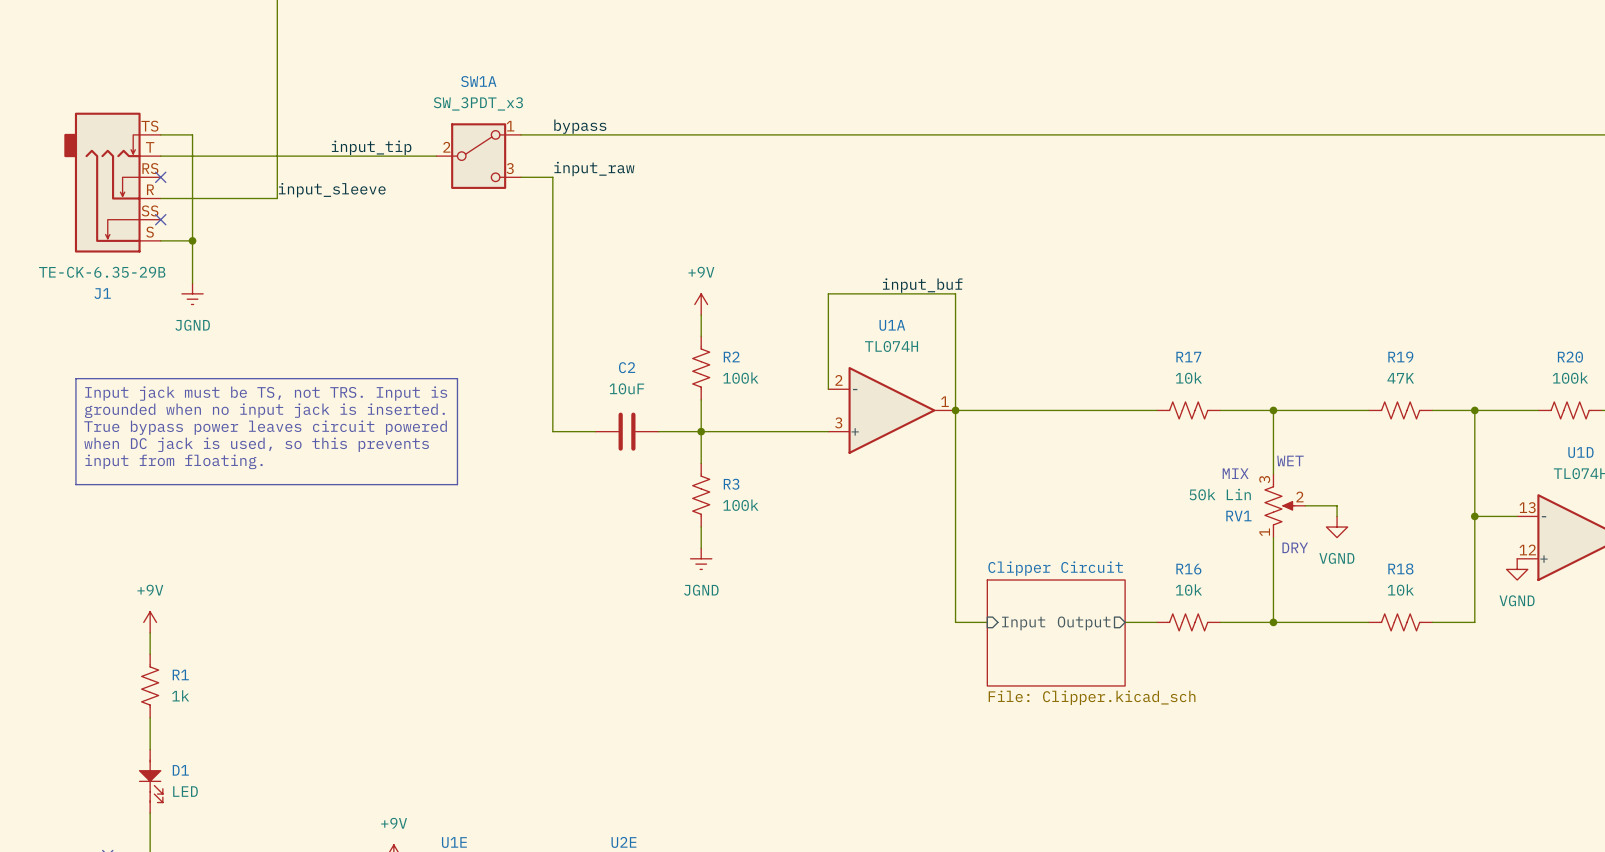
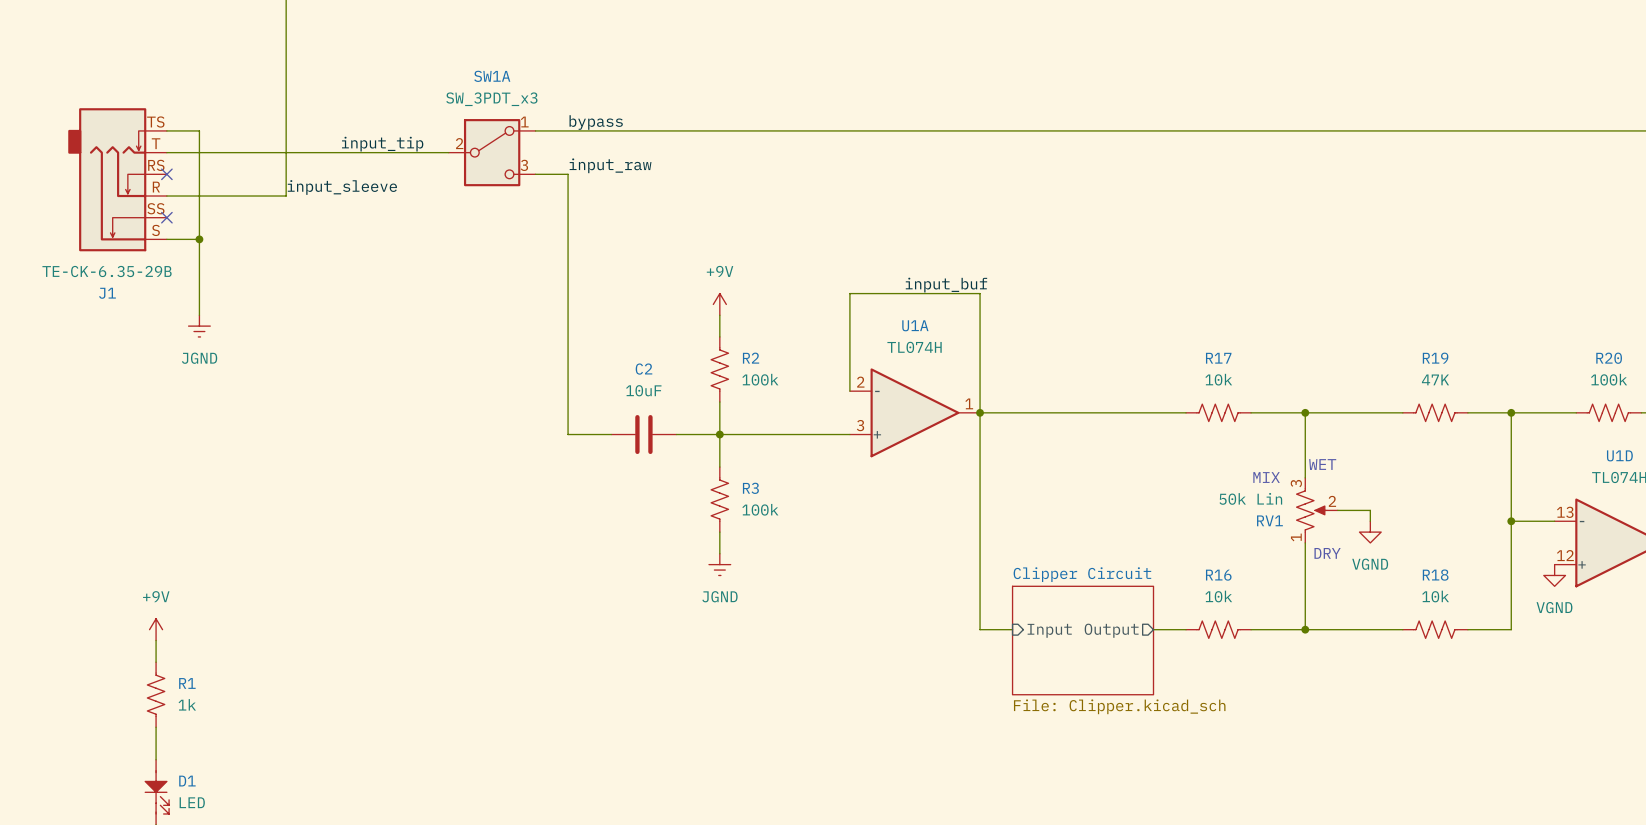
wire: none -> (199, 282) (199, 315)
power symbol position: JGND (192, 293) -> JGND (199, 326)
line: (75, 378) (457, 378) (457, 484) (75, 484) (75, 378) -> none
text: Input jack must be TS, not TRS. Input is (266, 393) -> none
text: grounded when no input jack is inserted. (264, 410) -> none
text: True bypass power leaves circuit powered (265, 427) -> none
text: when DC jack is used, so this prevents (256, 444) -> none
text: input from floating. (174, 461) -> none

